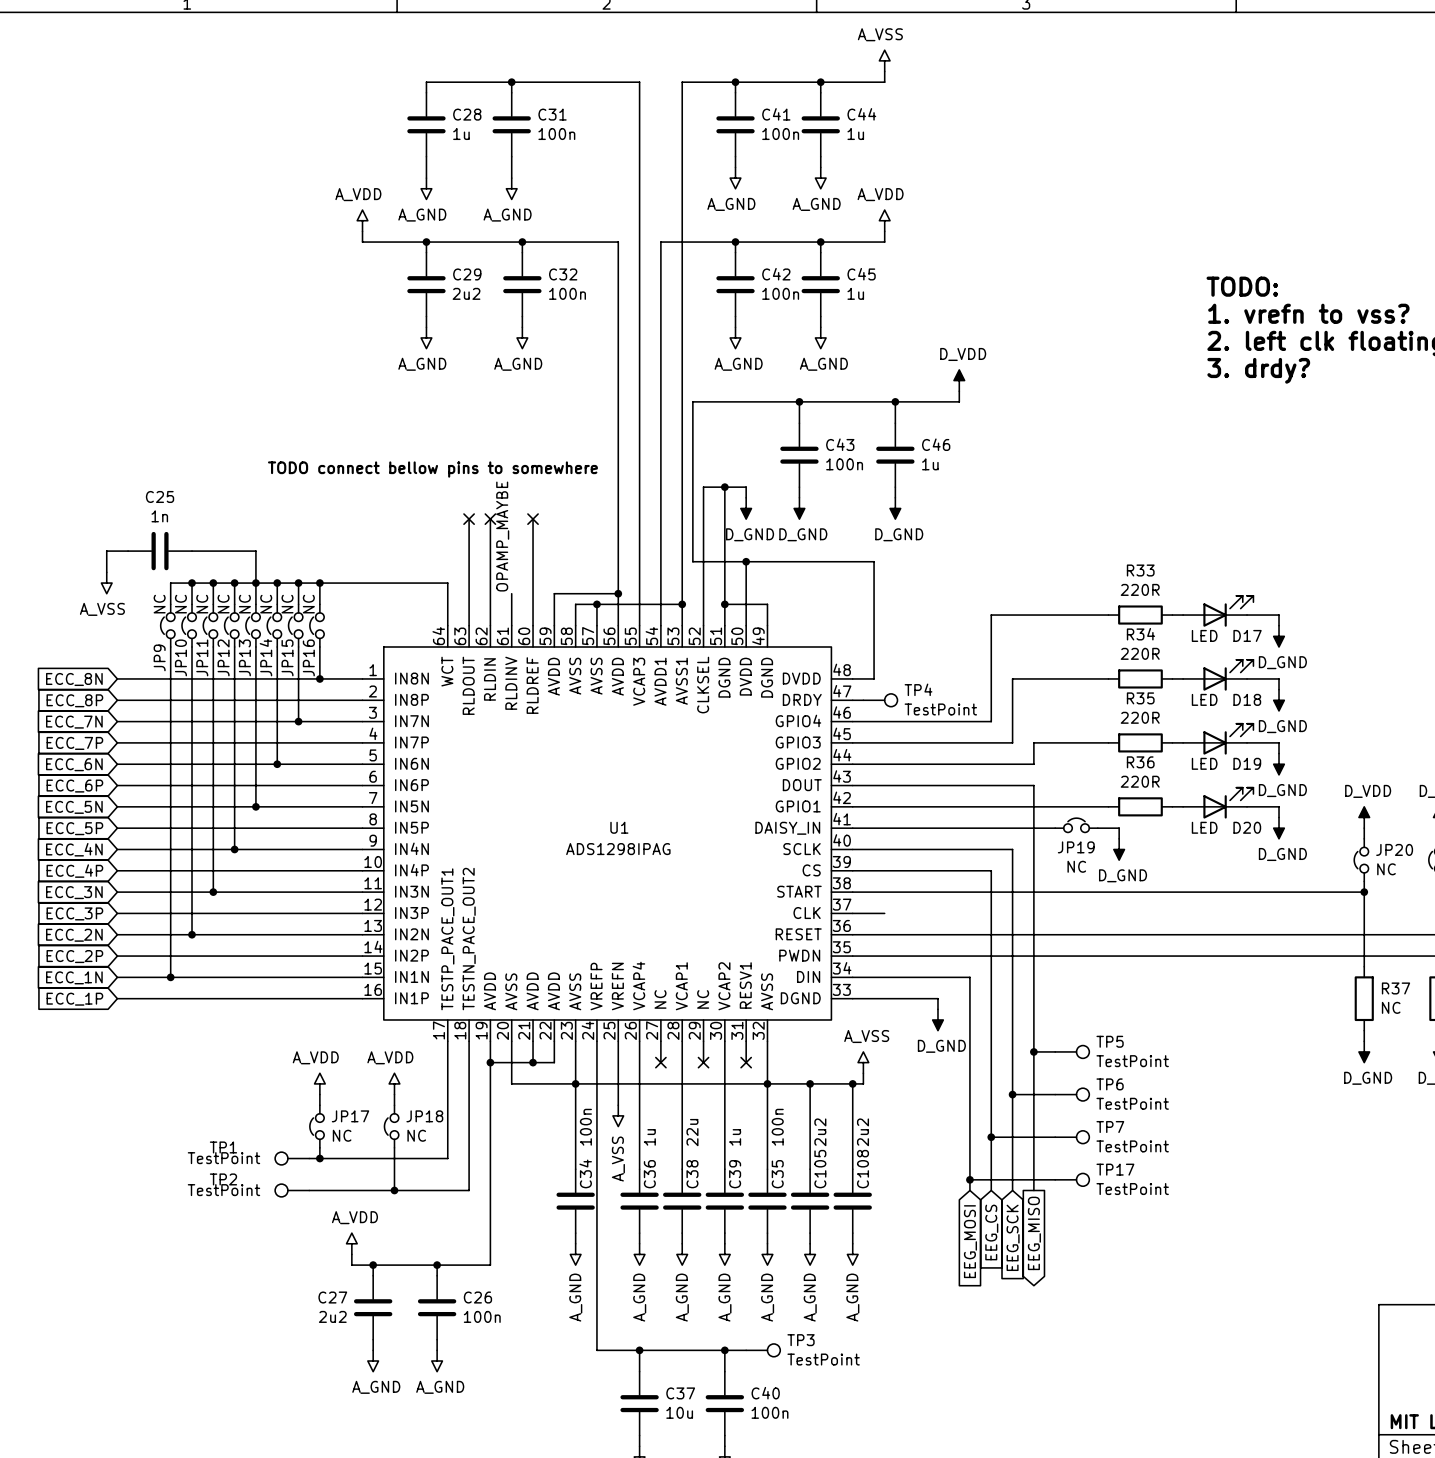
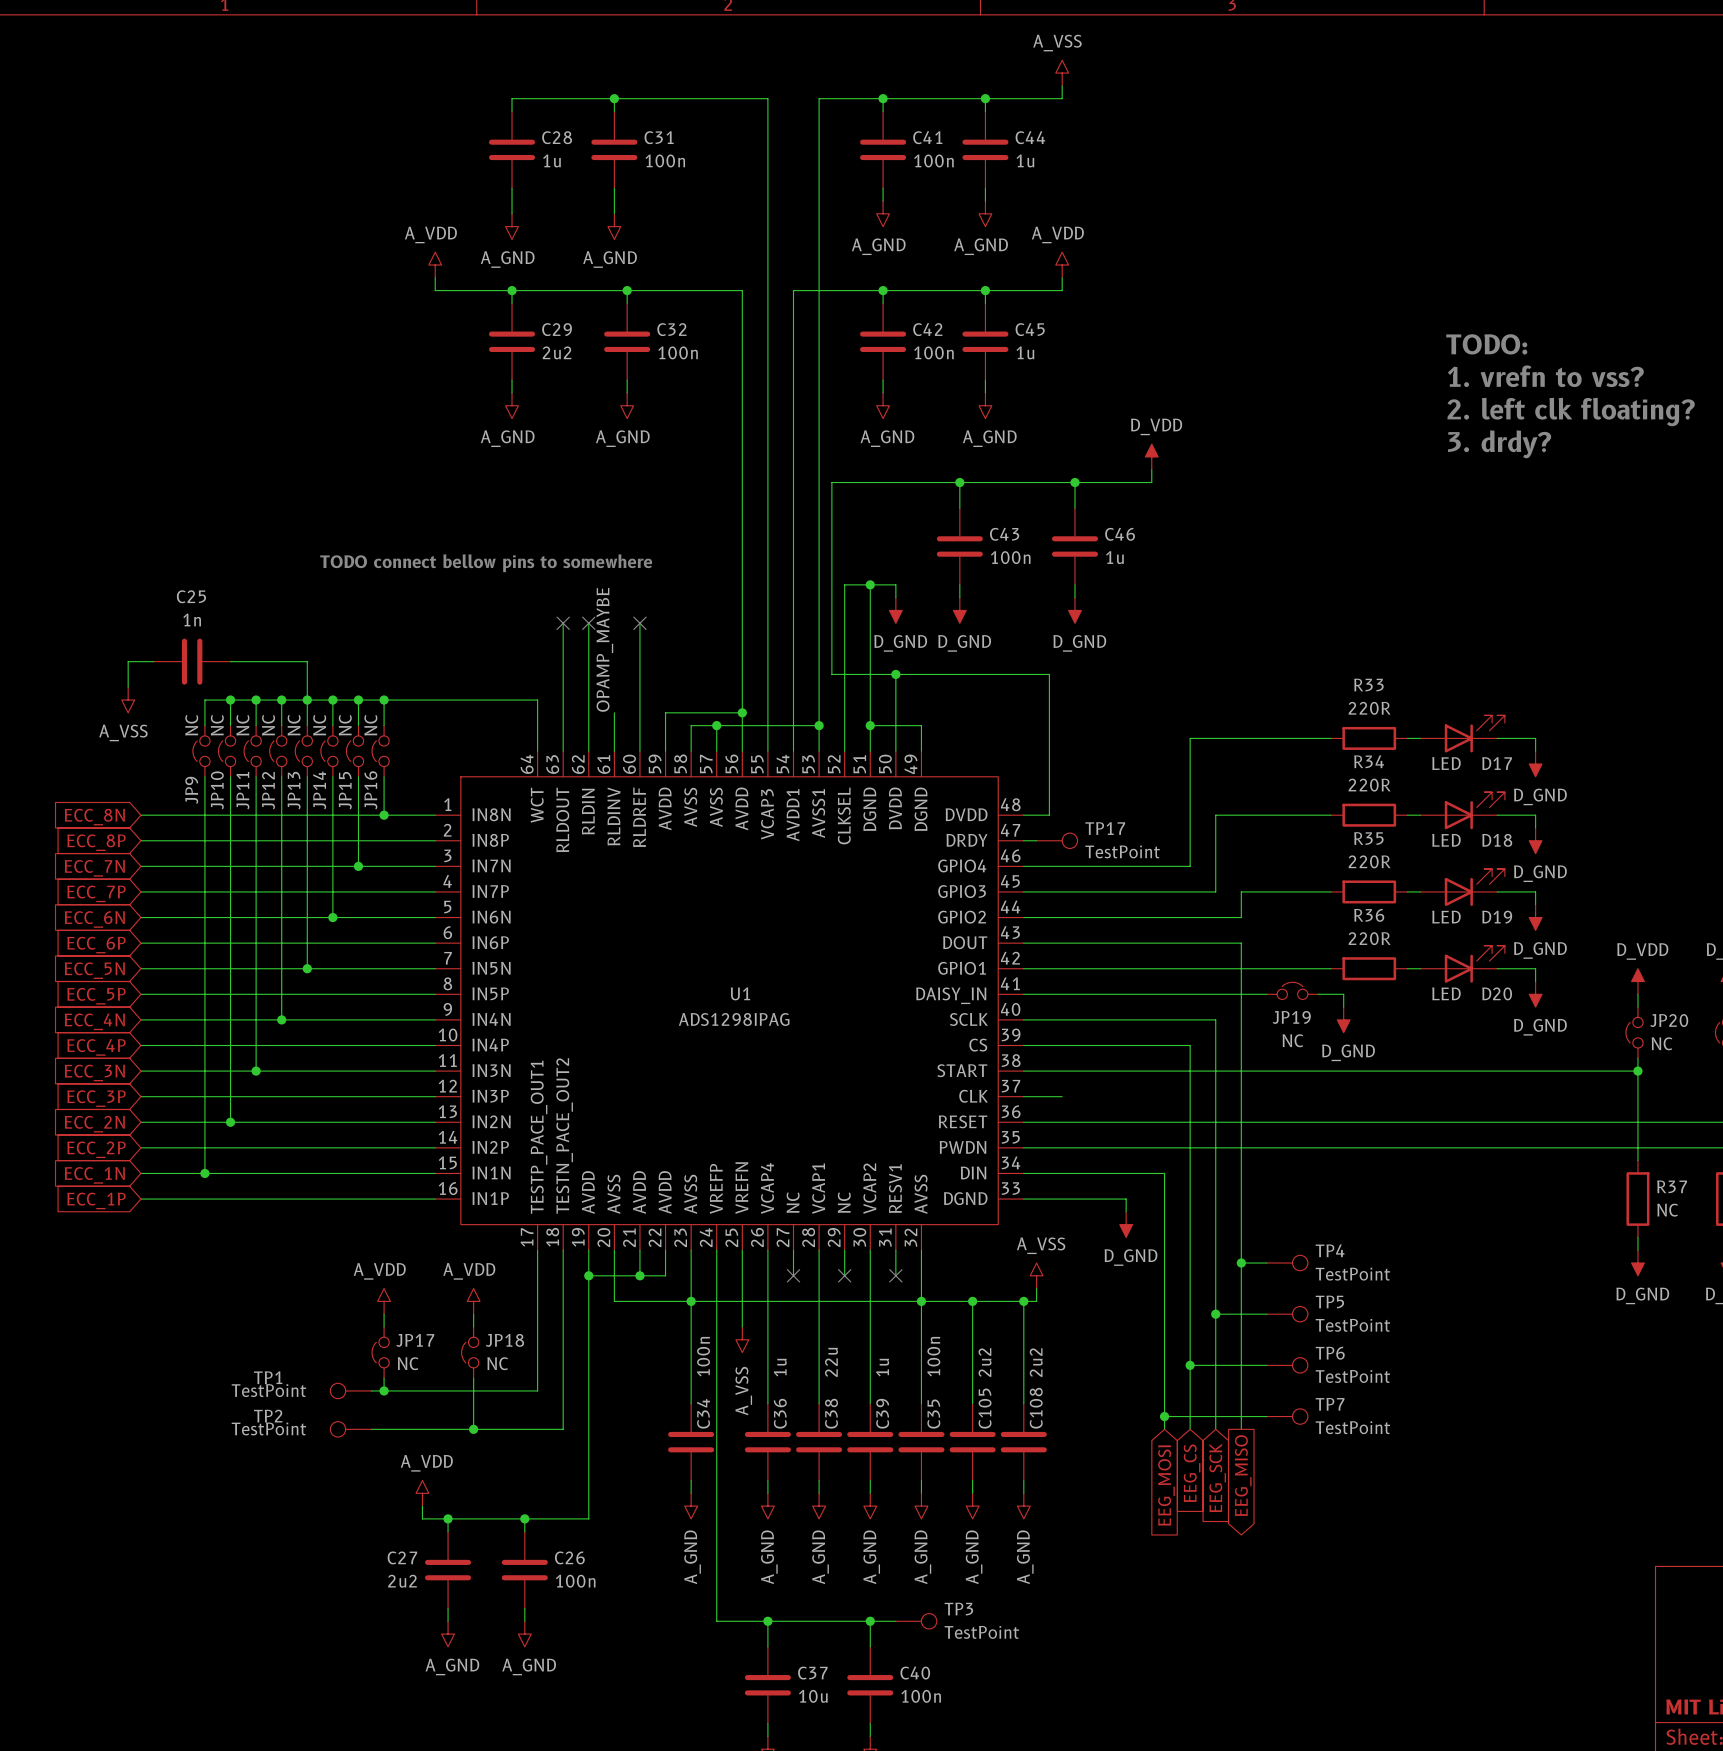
TP4 name: TP4 (918, 689) -> TP17 (1105, 828)
TP5 name: TP5 (1110, 1041) -> TP4 (1330, 1250)
TP6 name: TP6 (1110, 1084) -> TP5 (1329, 1301)
TP7 name: TP7 (1110, 1127) -> TP6 (1330, 1353)
TP17 name: TP17 (1115, 1169) -> TP7 (1330, 1404)

